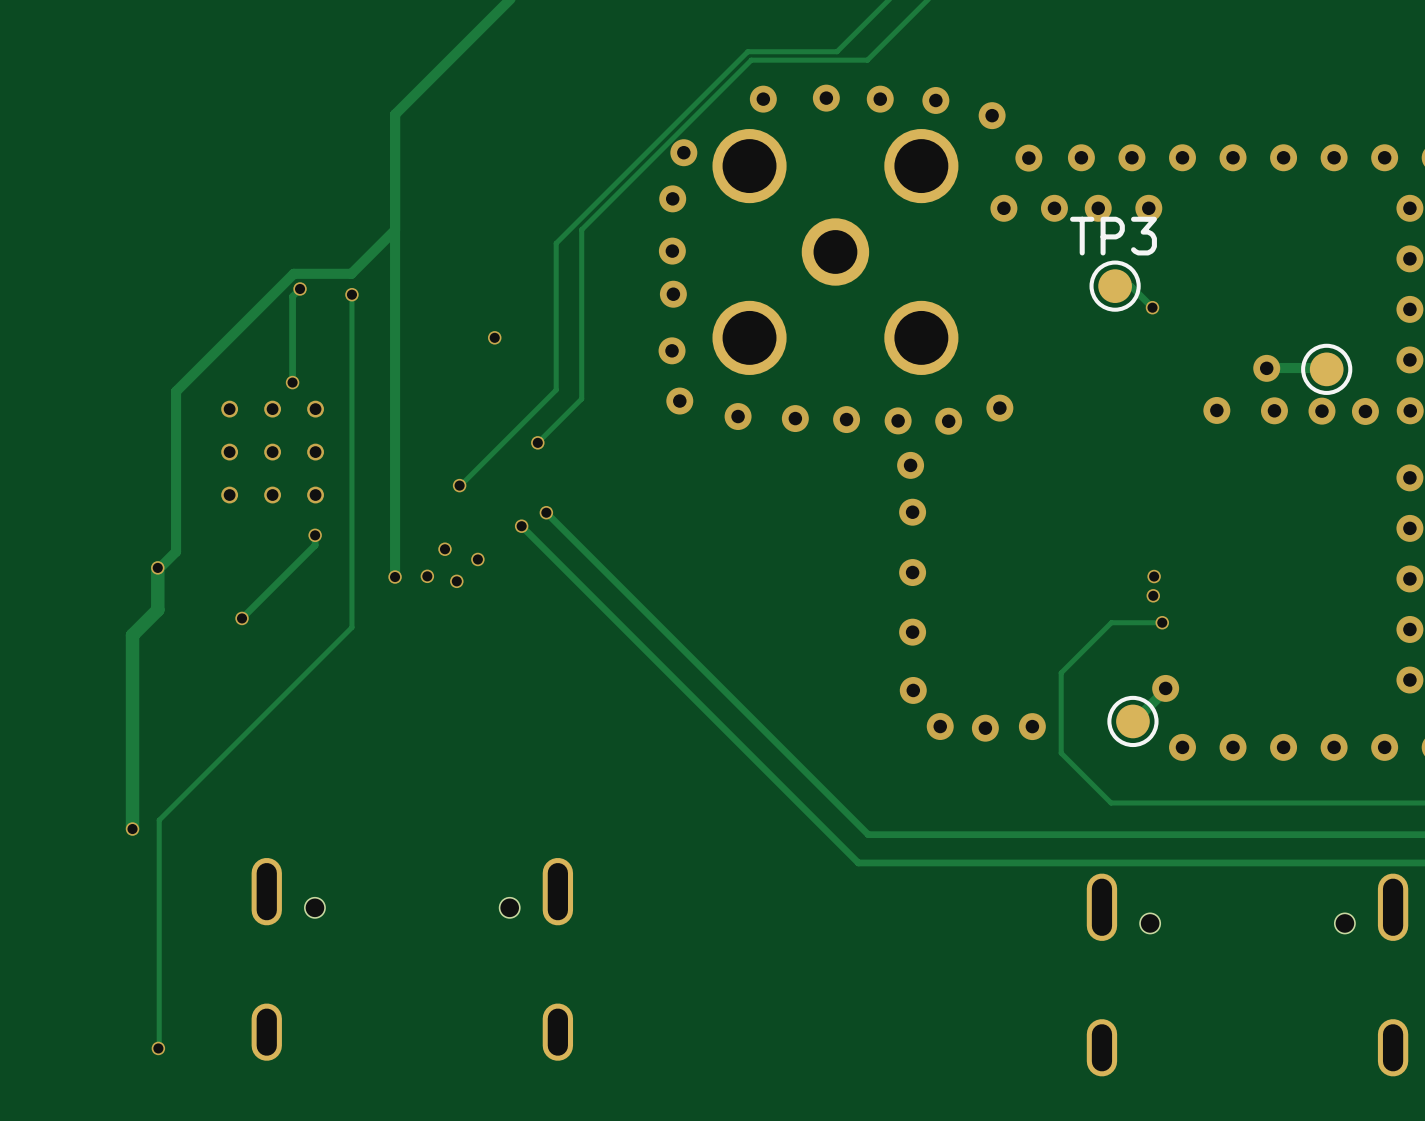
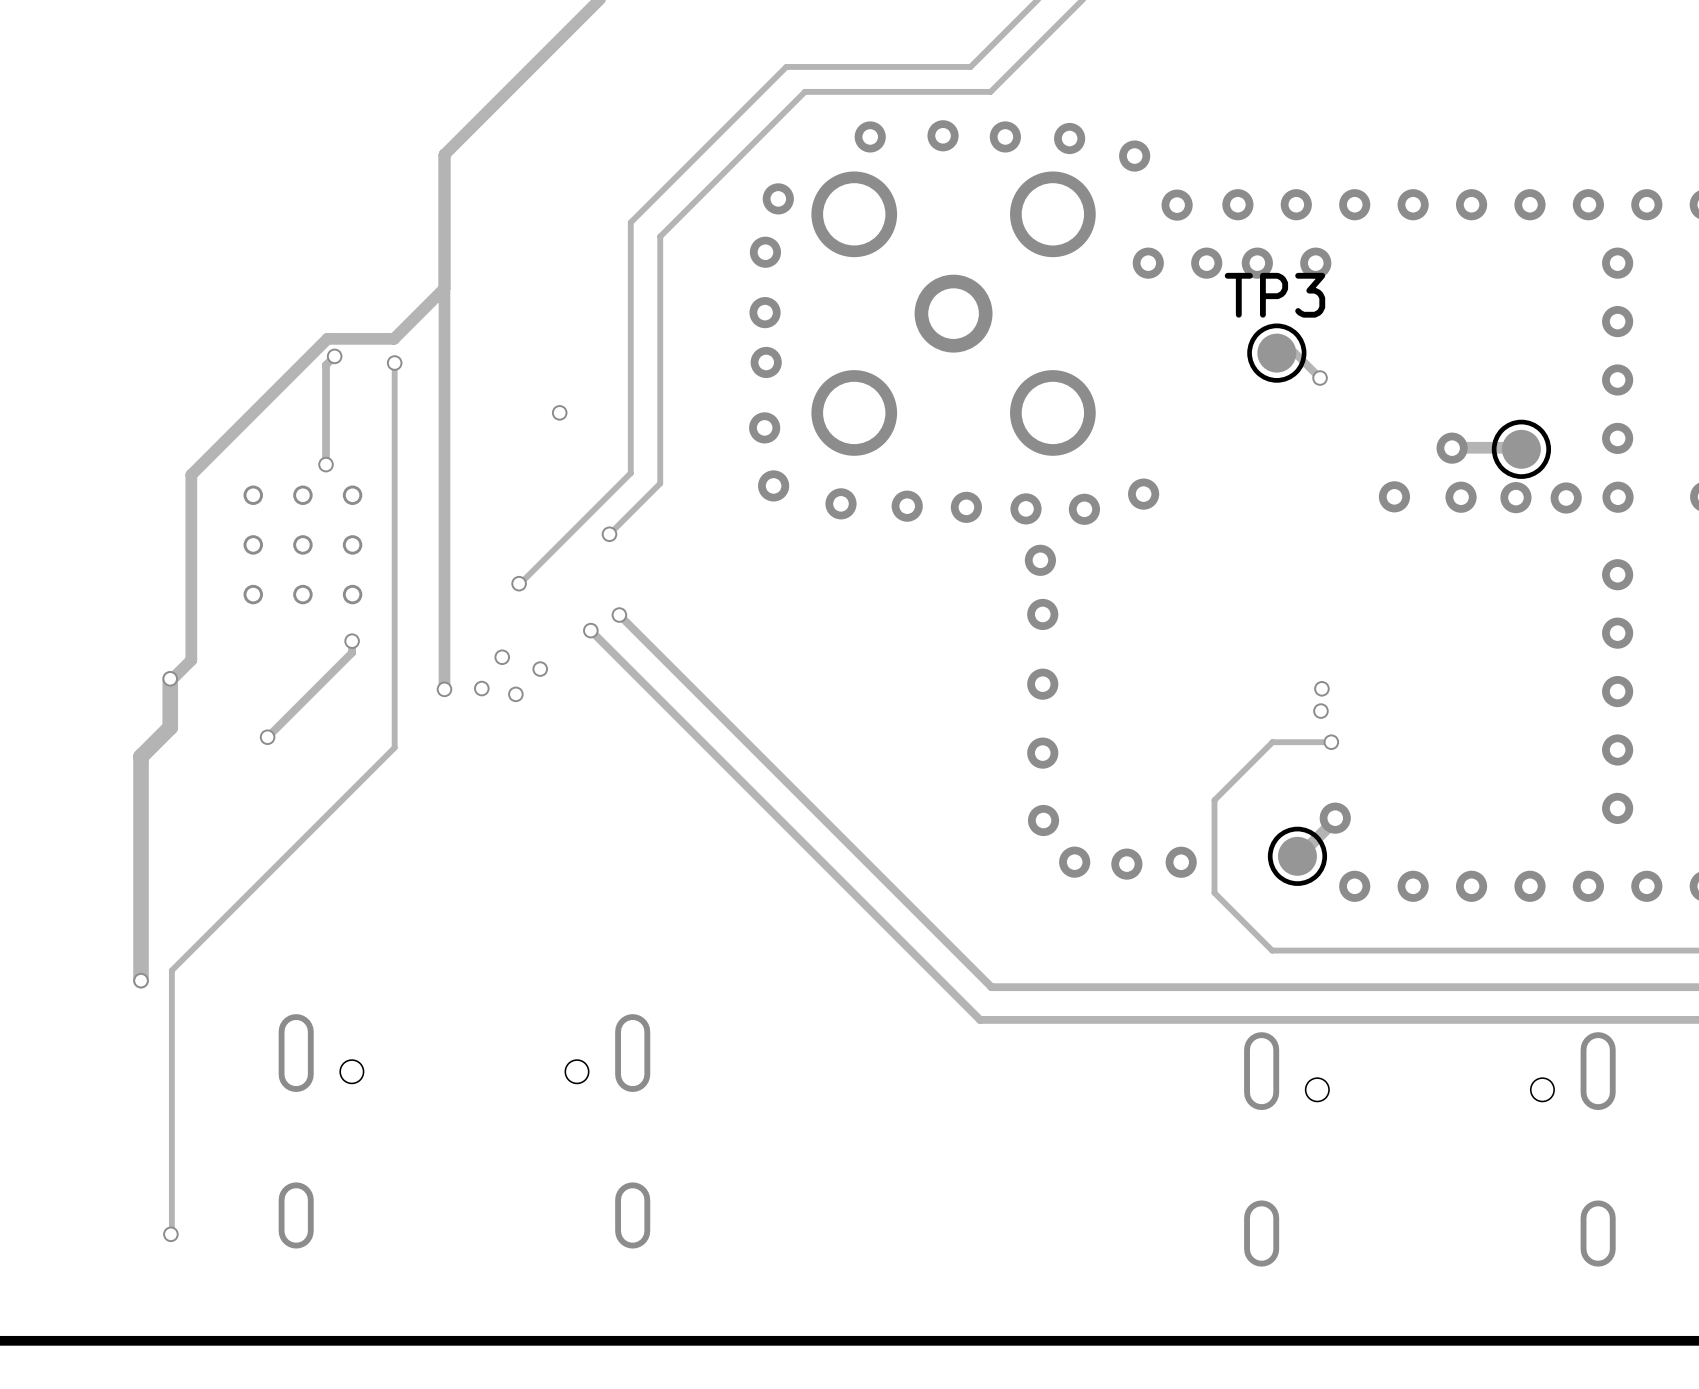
track: (850, 38) (837, 51) (747, 51) (556, 243) -> (970, 66) (786, 66) (630, 222) (630, 303)
track: (751, 60) (581, 229) -> (856, 91) (804, 91) (660, 236) (660, 287)

